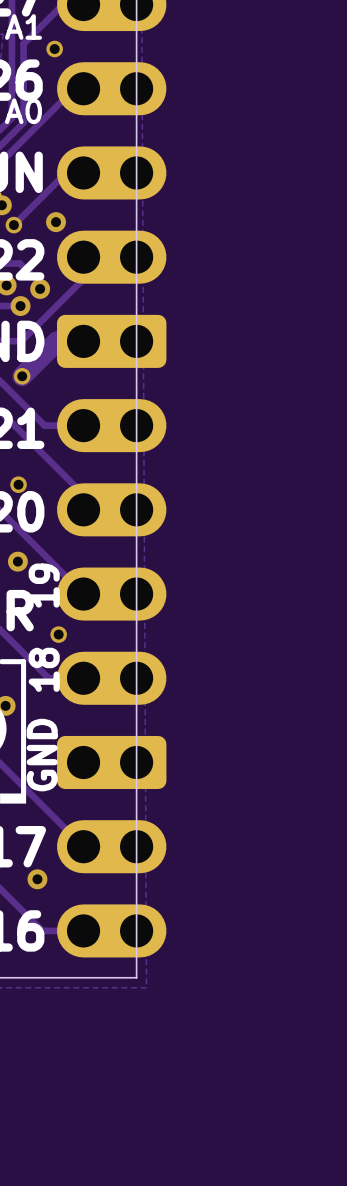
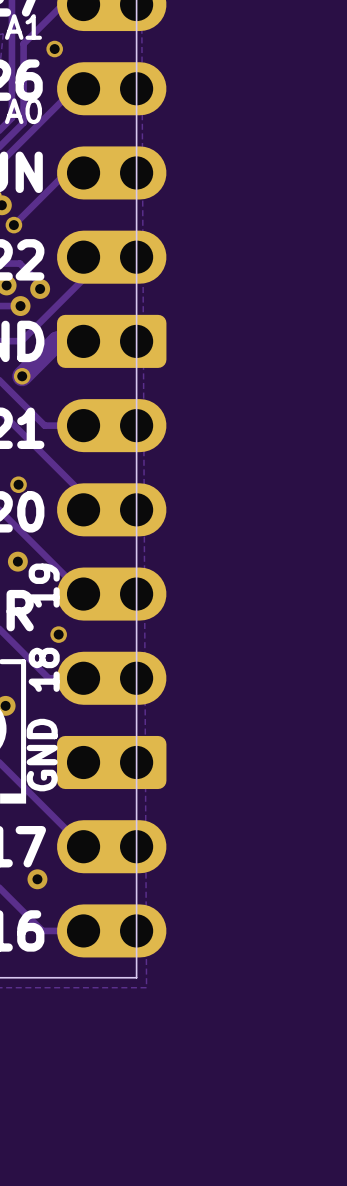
via: (56, 222) -> none

